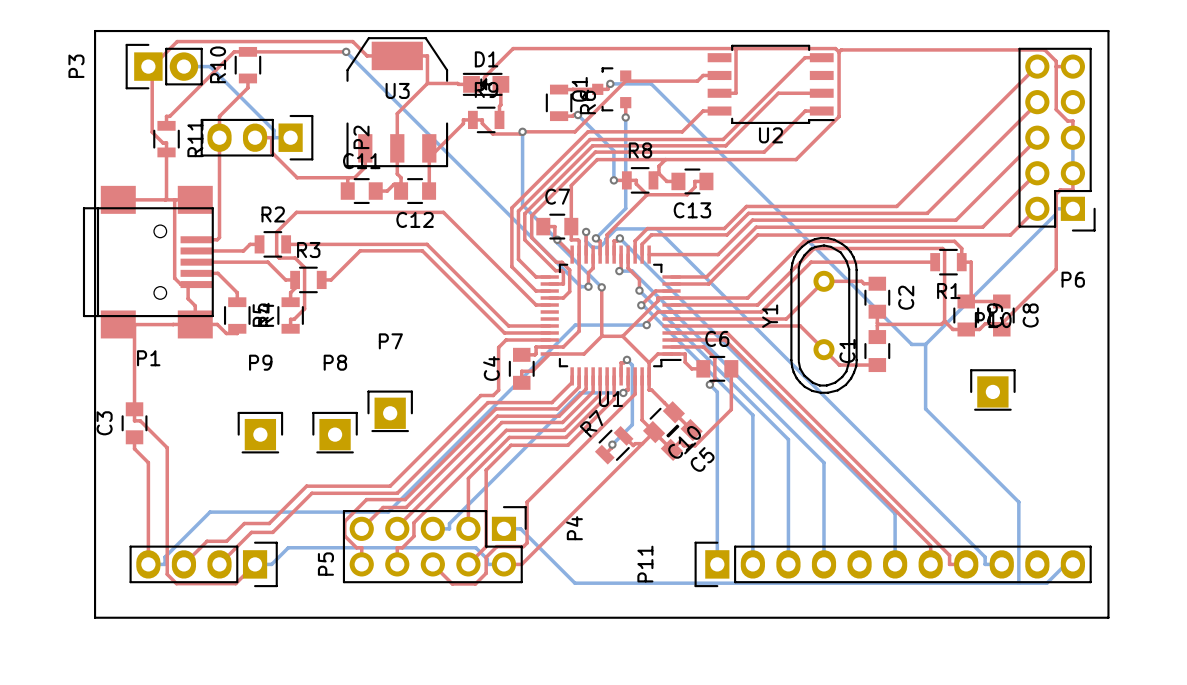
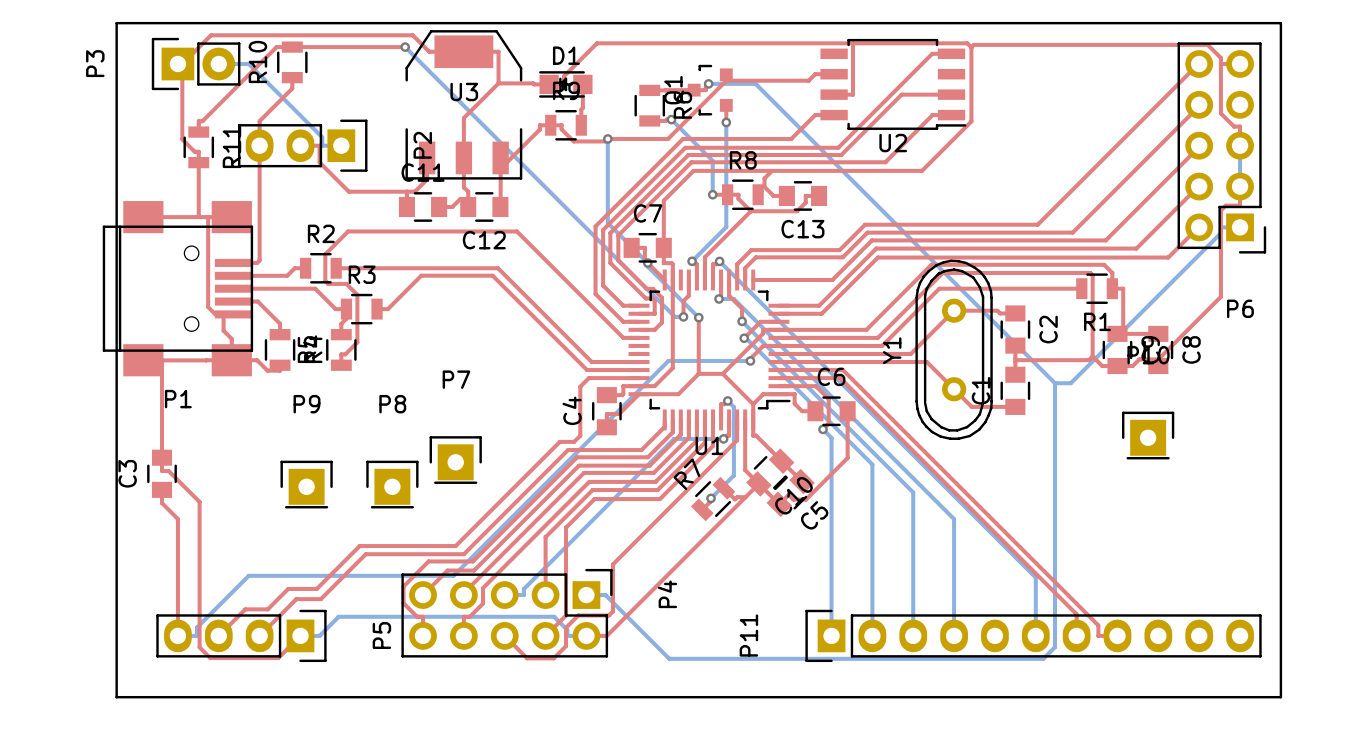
top track: (586, 231) (586, 254) -> none
bottom track: (586, 231) (586, 241) (592, 247) (599, 247) (616, 228) (656, 228) (985, 557) (985, 564) (1001, 564) -> none
via: (586, 231) -> none
bottom track: (925, 344) (925, 408) (1018, 502) (1018, 583) -> none
bottom track: (1072, 564) (1065, 564) (1046, 583) (574, 583) -> (1054, 383) (1054, 647) (1043, 658) (667, 657)

